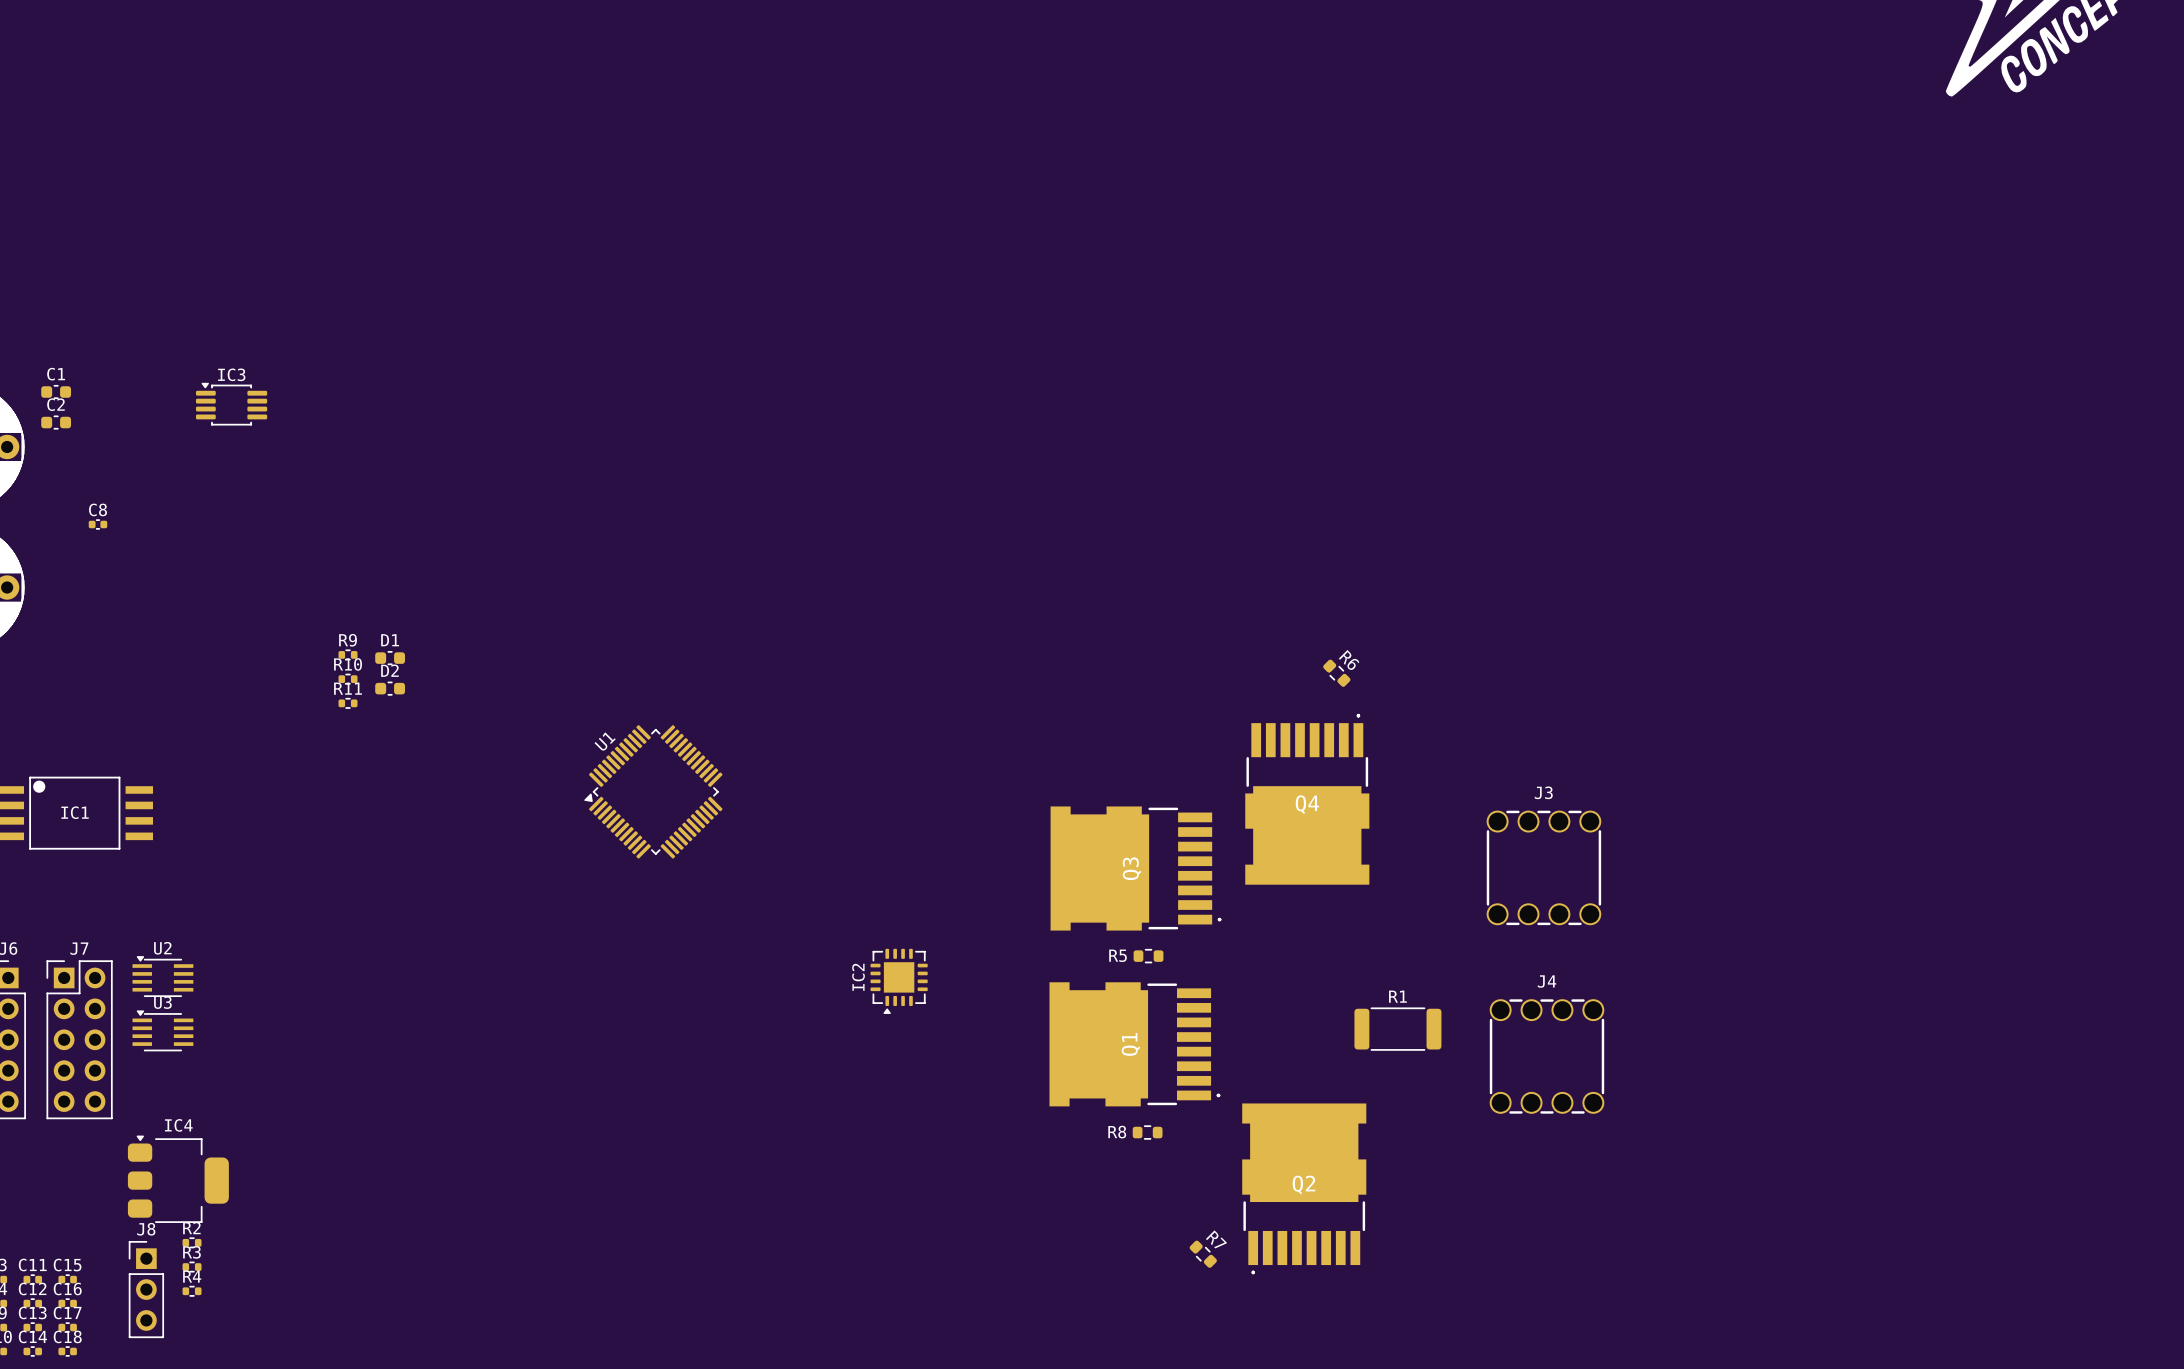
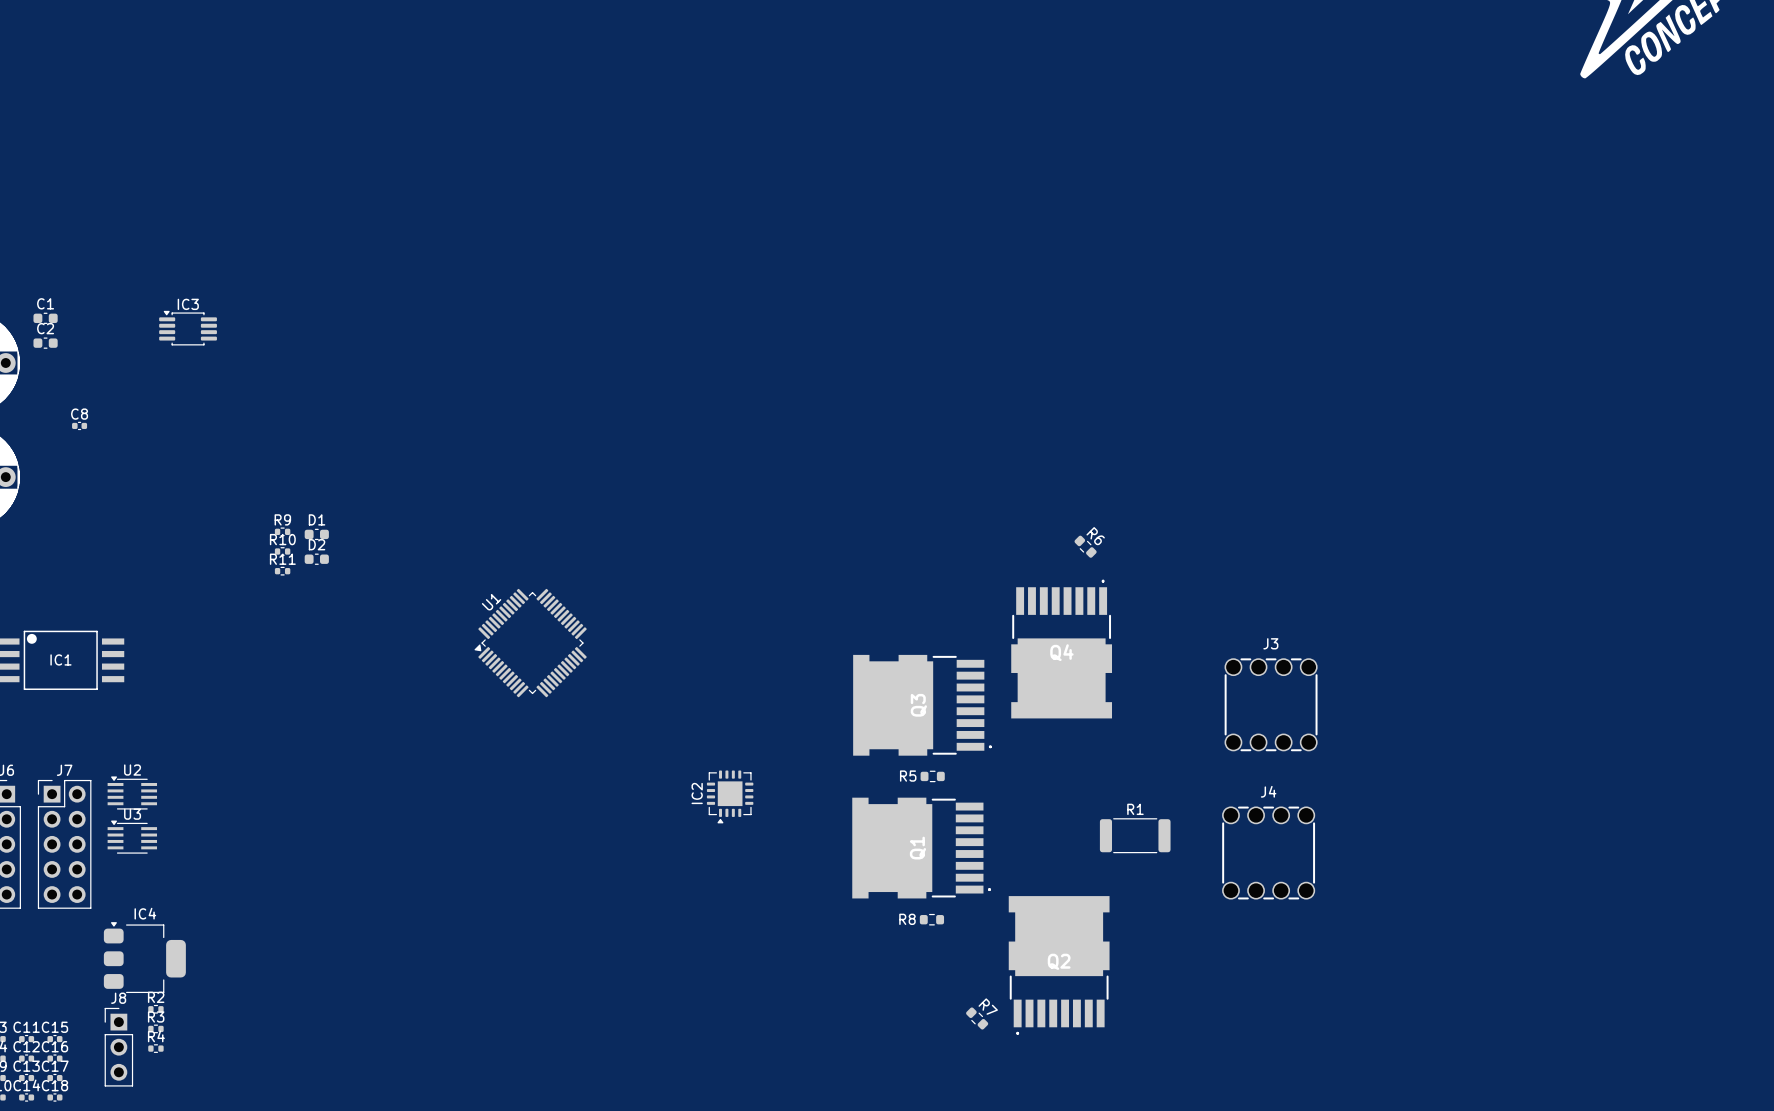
J3 position: (1543, 867) -> (1271, 704)
J4 position: (1546, 1056) -> (1268, 853)

